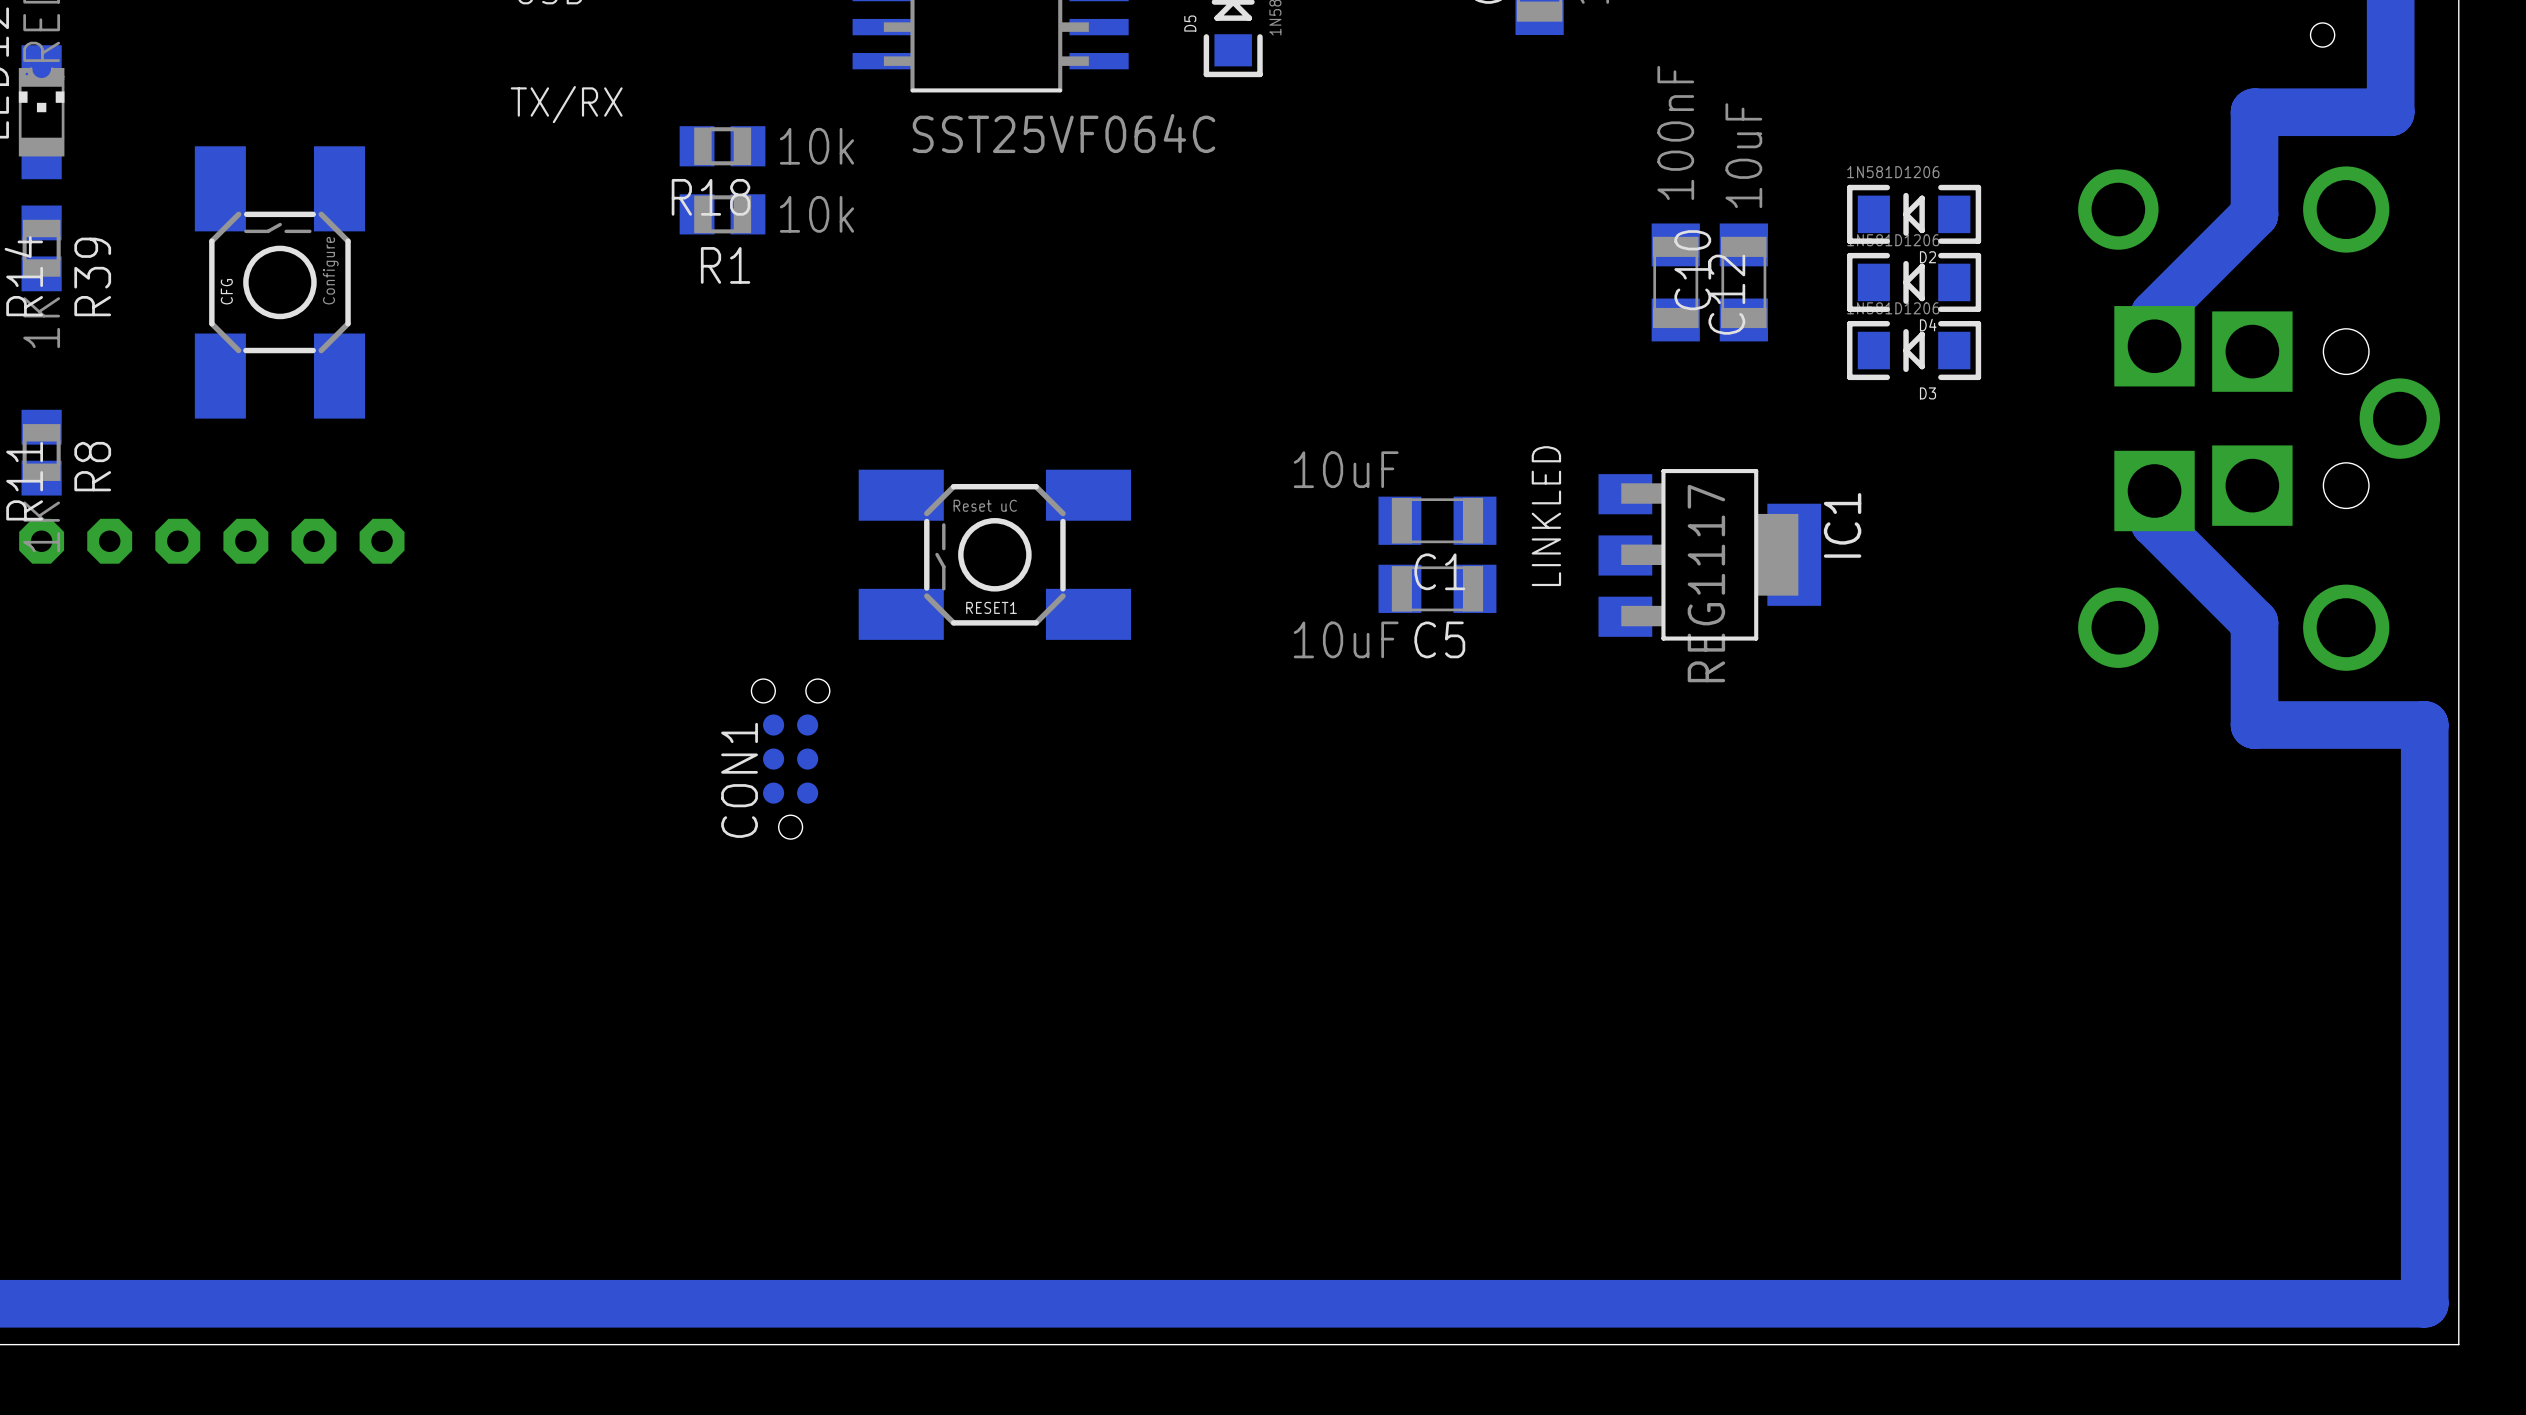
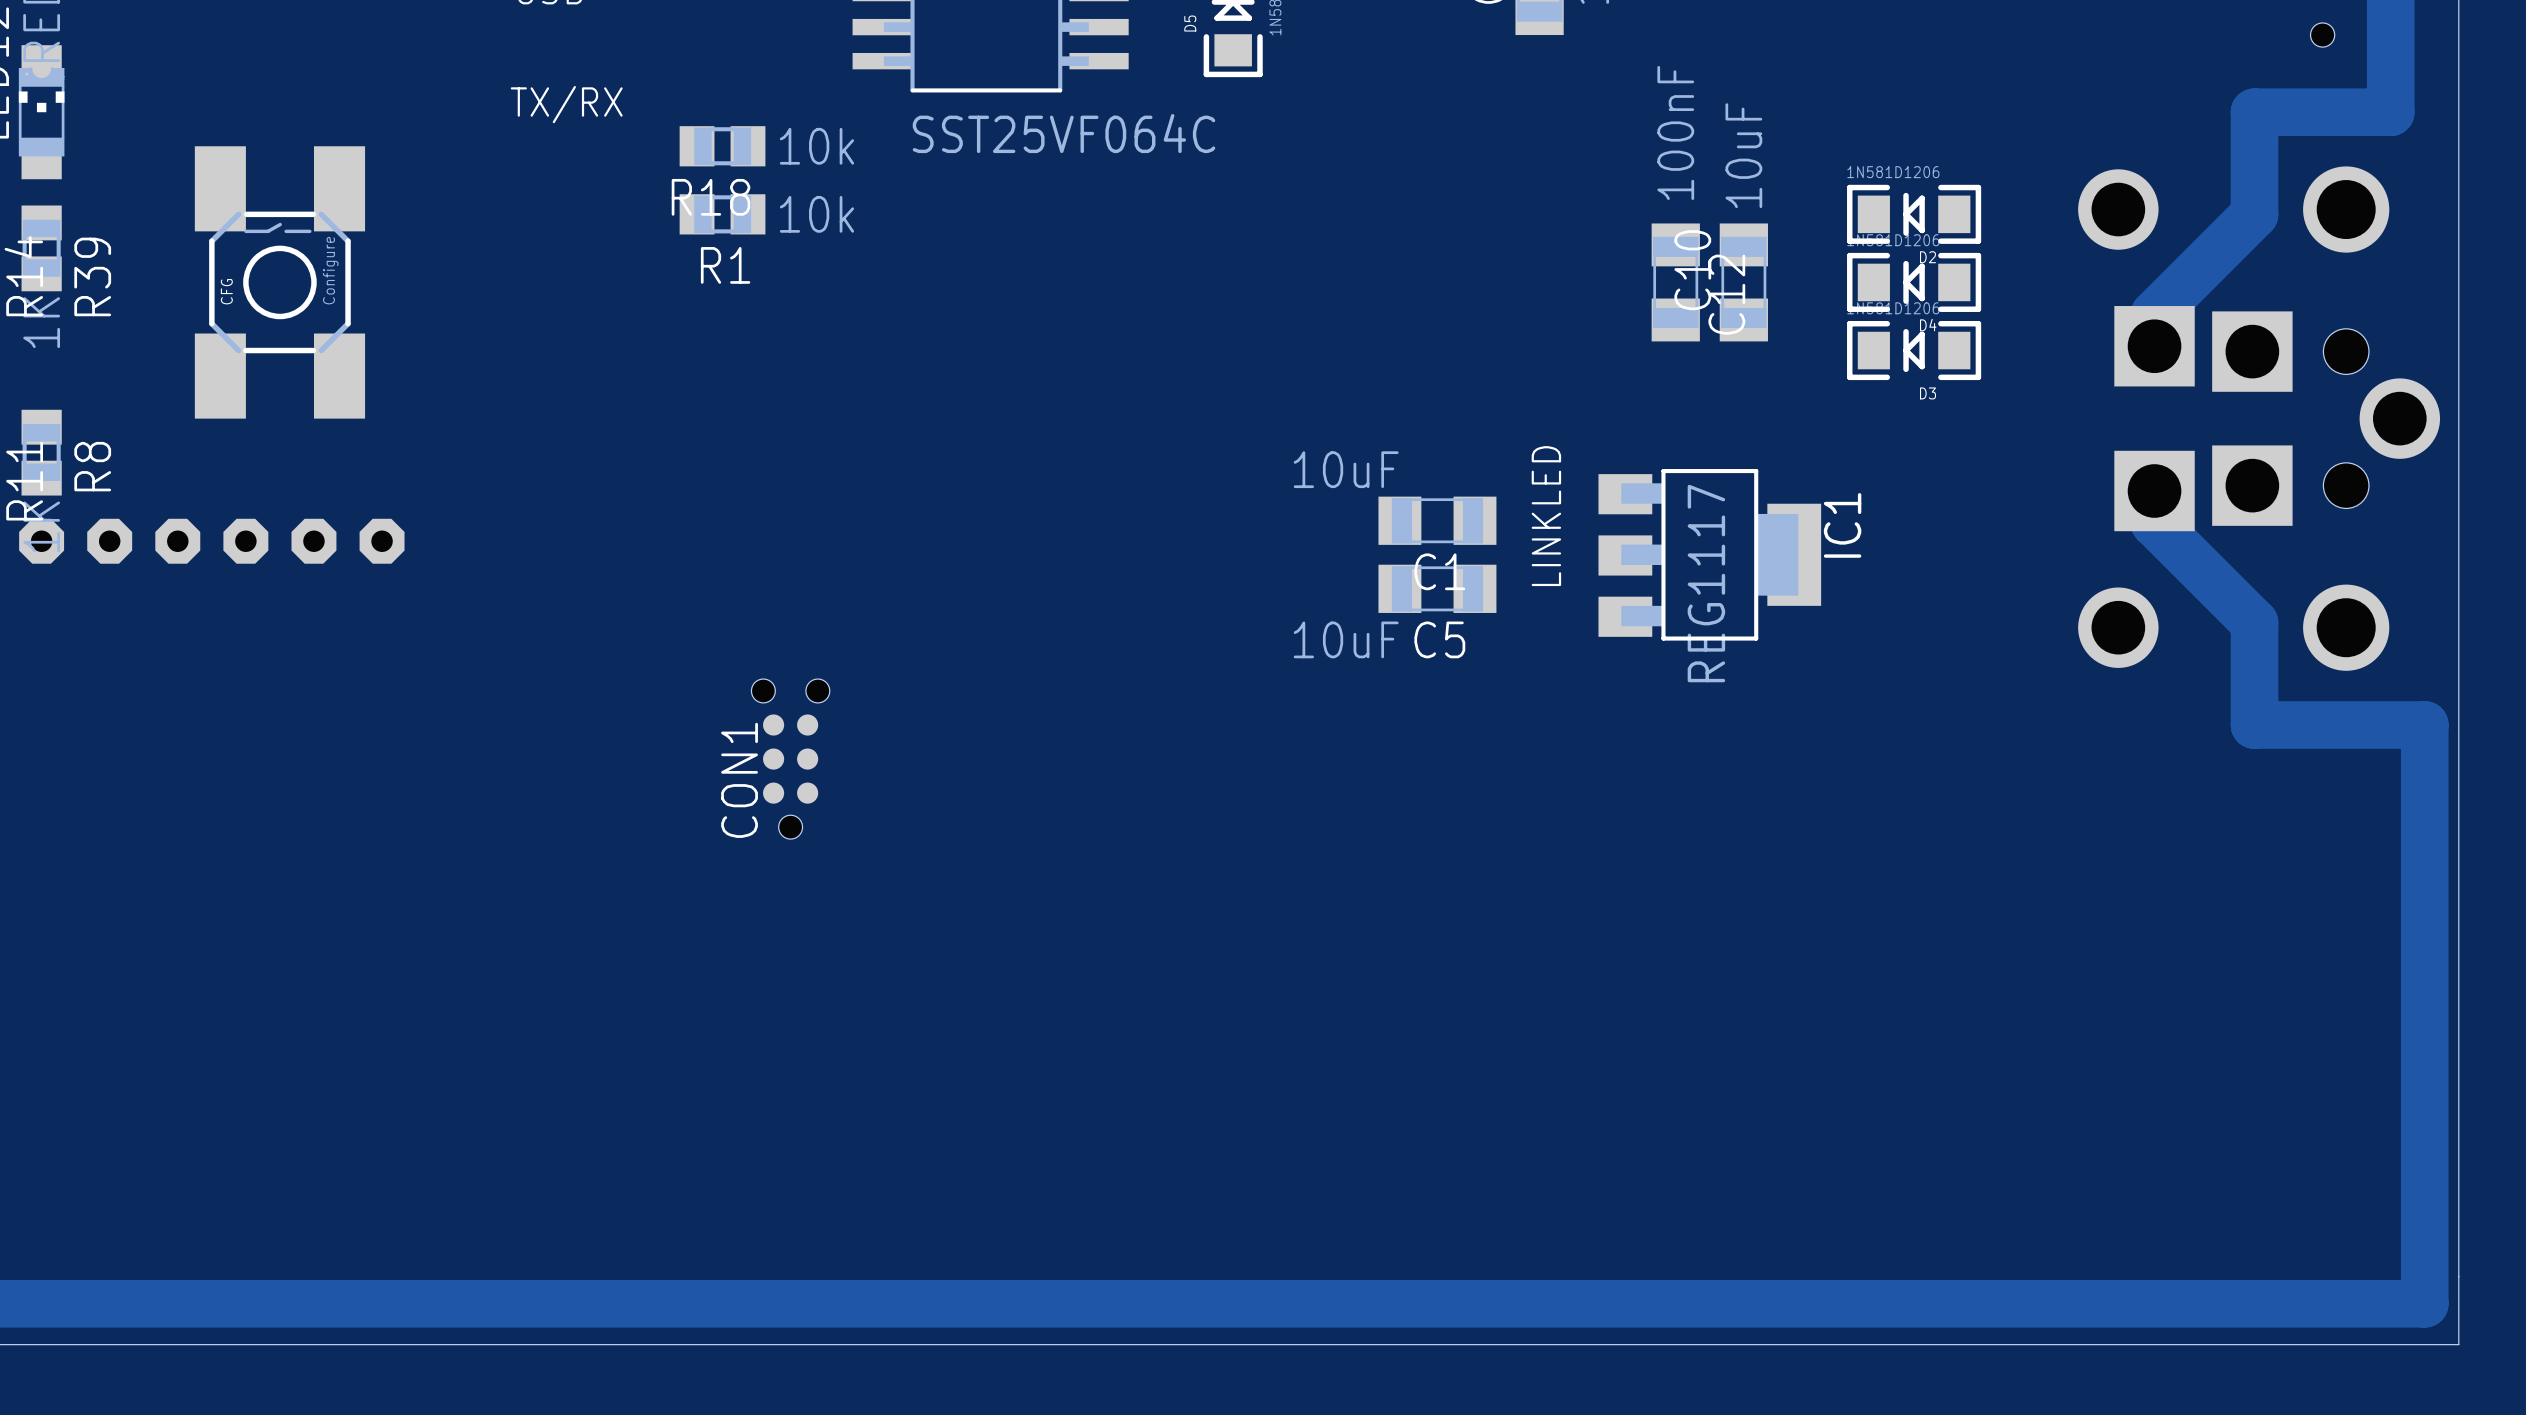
RESET1: Reset uC (994, 554) -> none

